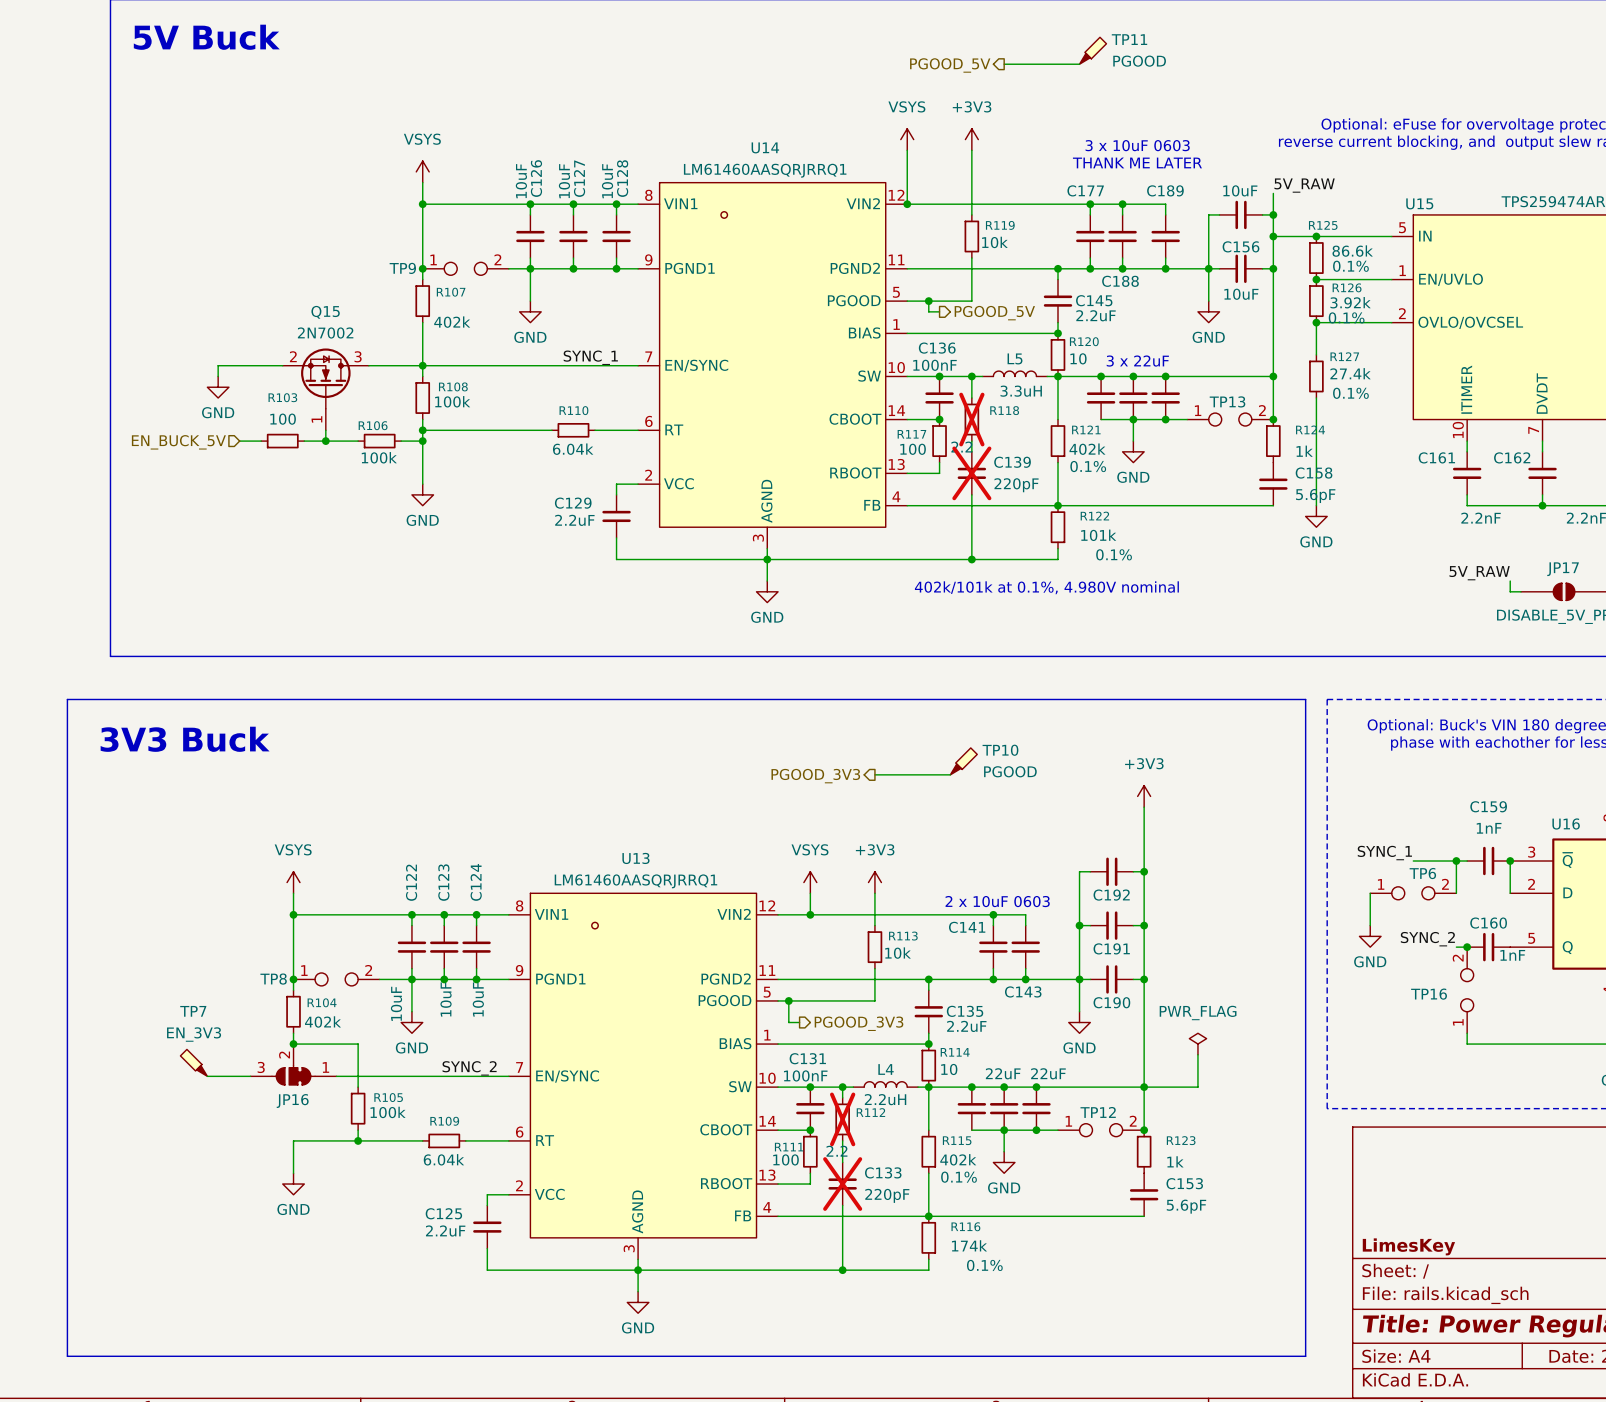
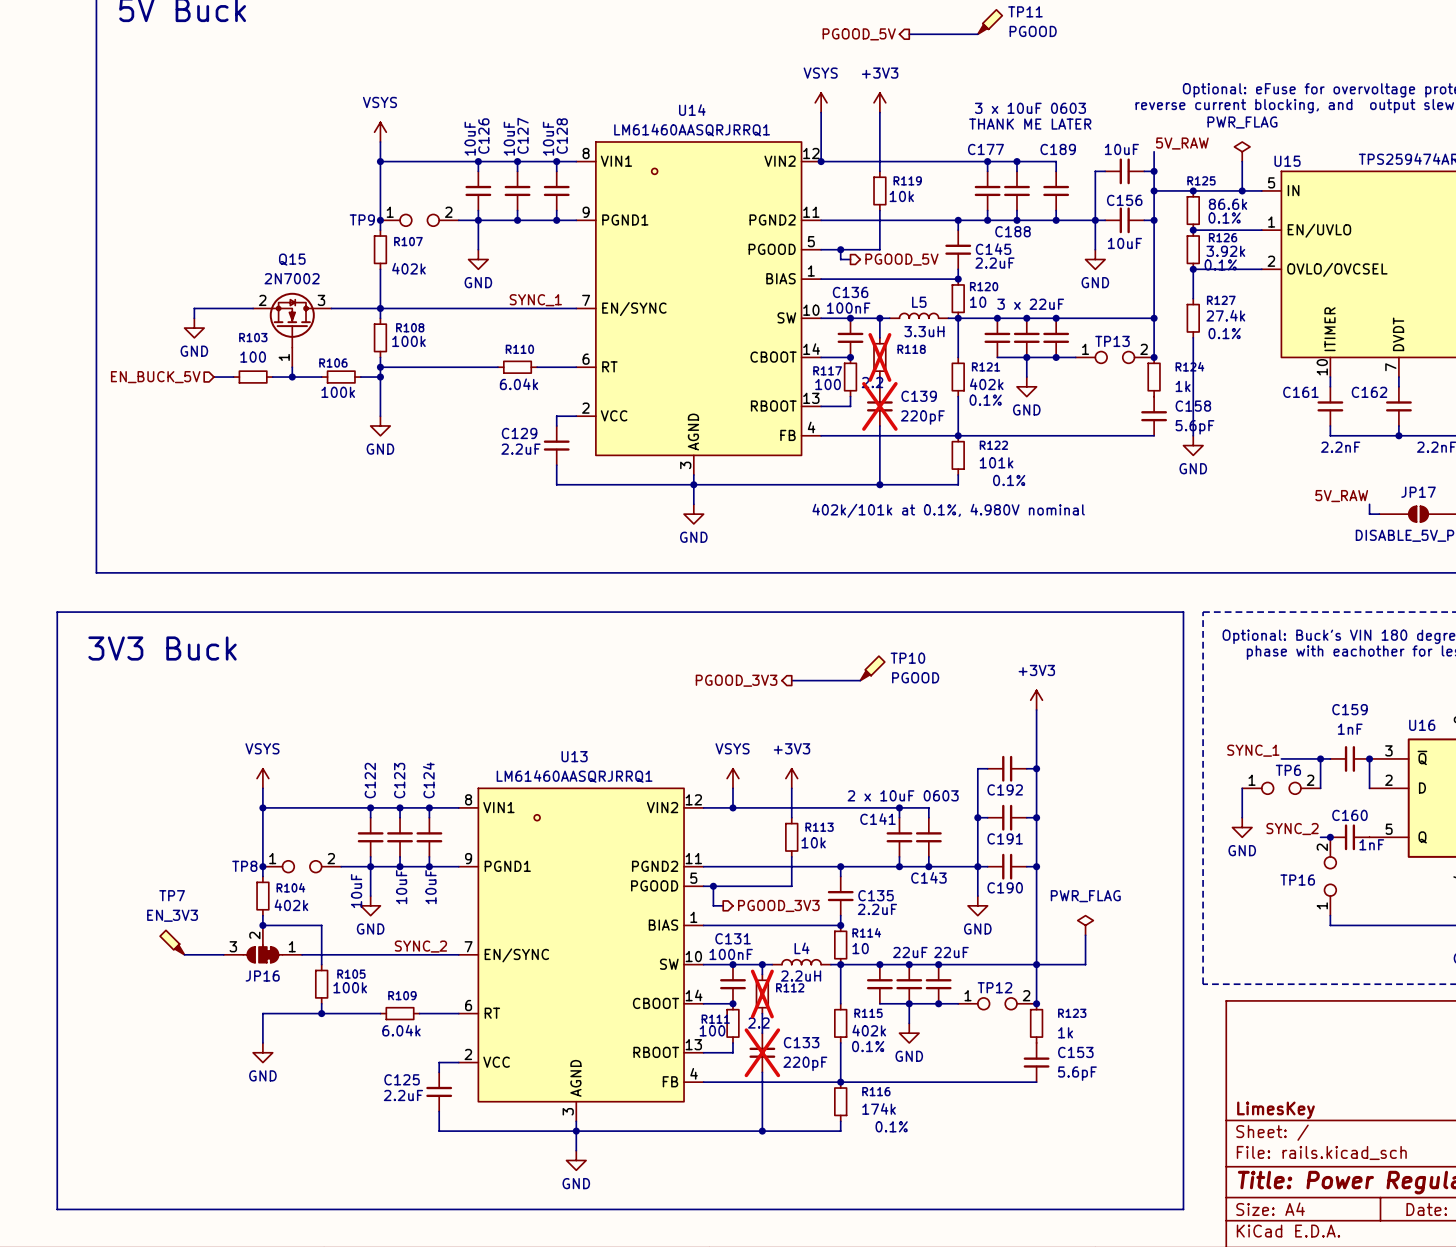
power symbol: none -> PWR_FLAG (1242, 151)
wire: none -> (1242, 161) (1242, 190)
junction: none -> (1242, 190)

